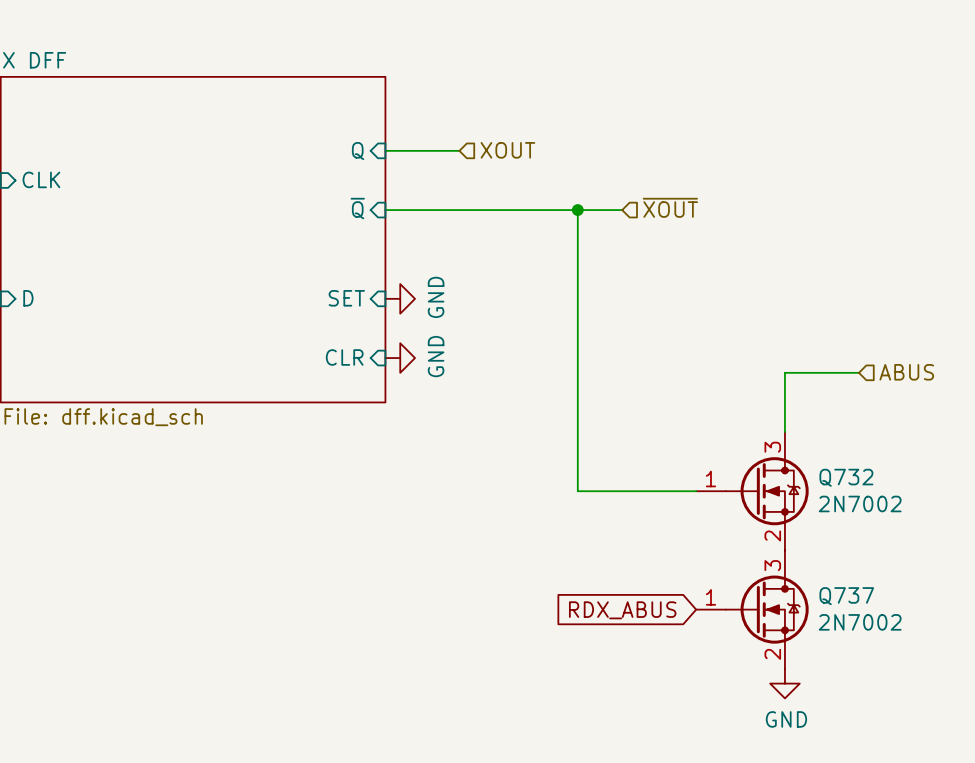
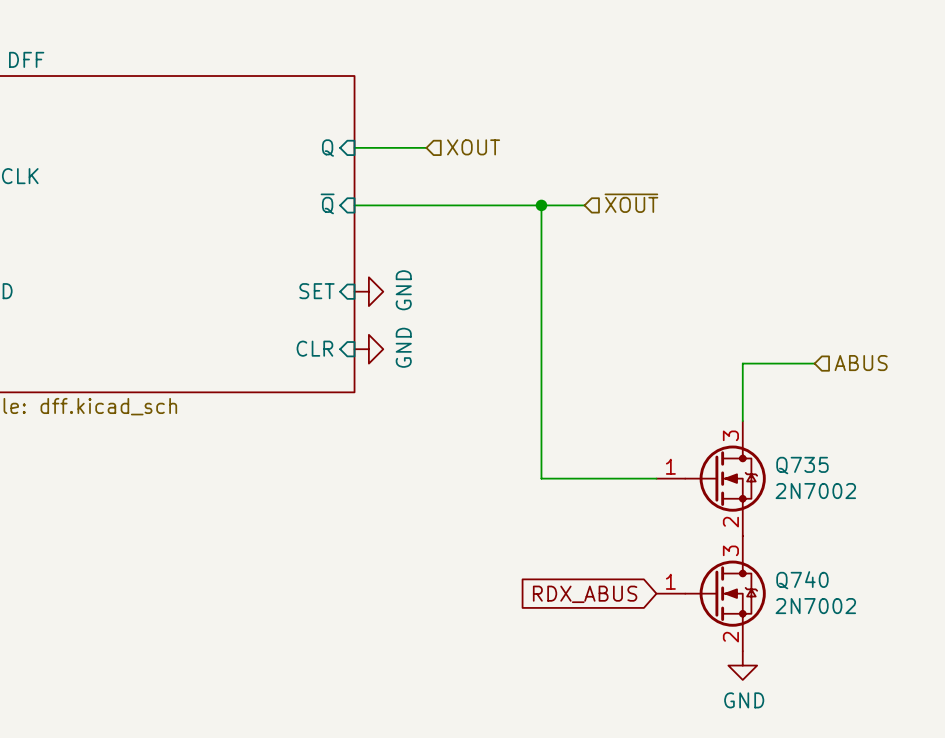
Q732 name: Q732 (846, 477) -> Q735 (802, 465)
Q737 name: Q737 (846, 596) -> Q740 (802, 580)

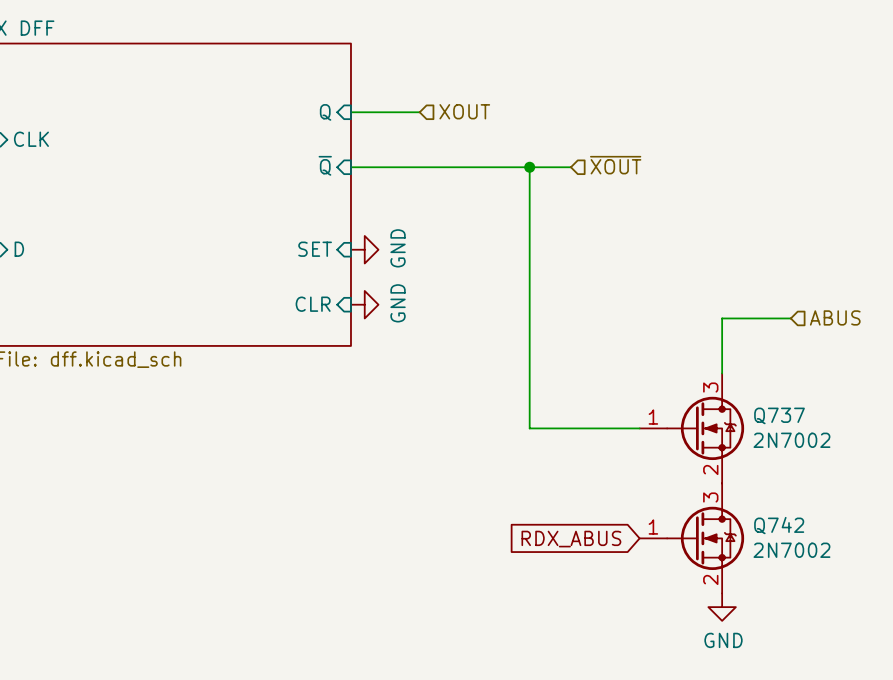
Q735 name: Q735 (802, 465) -> Q737 (779, 415)
Q740 name: Q740 (802, 580) -> Q742 (779, 525)

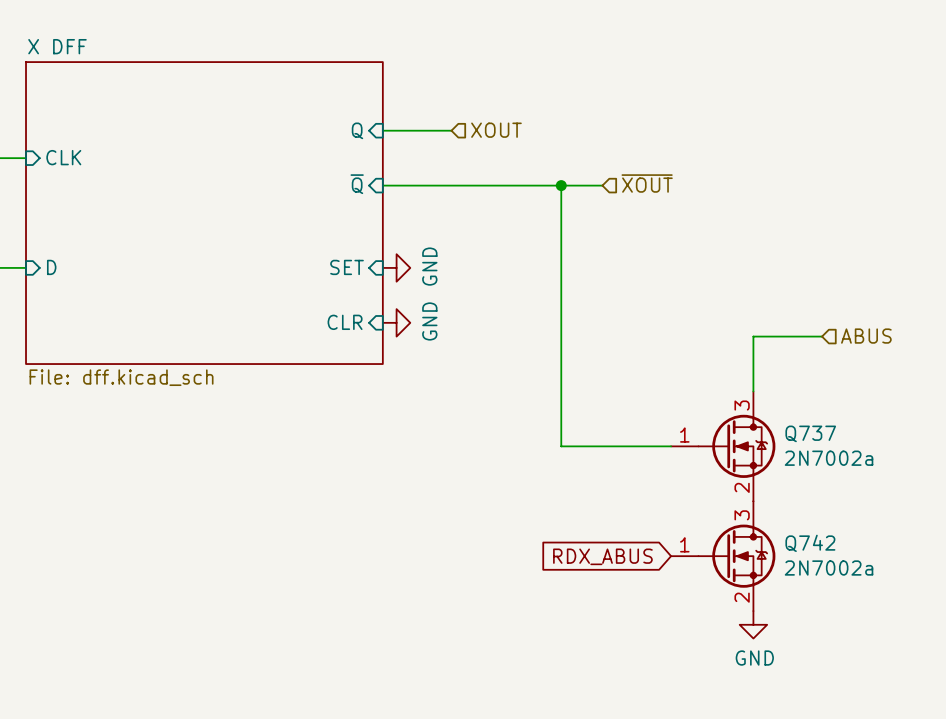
Q737 value: 2N7002 (791, 440) -> 2N7002a (829, 458)
Q742 value: 2N7002 (791, 550) -> 2N7002a (829, 568)

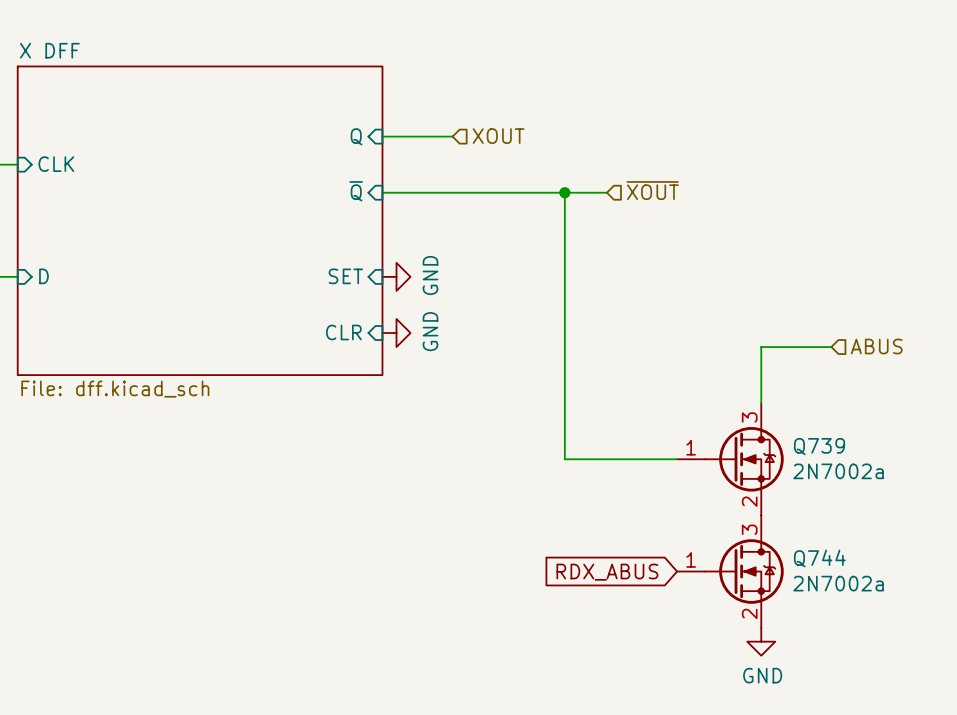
Q737 name: Q737 (810, 433) -> Q739 (819, 446)
Q742 name: Q742 (810, 543) -> Q744 (819, 558)

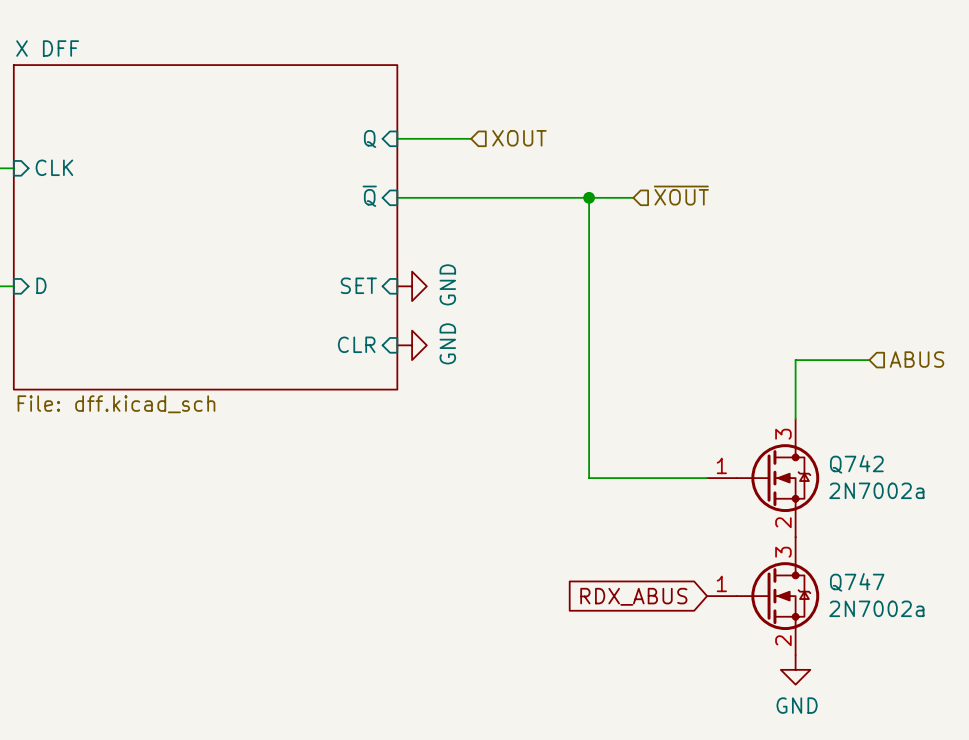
Q739 name: Q739 (819, 446) -> Q742 (856, 464)
Q744 name: Q744 (819, 558) -> Q747 (857, 582)

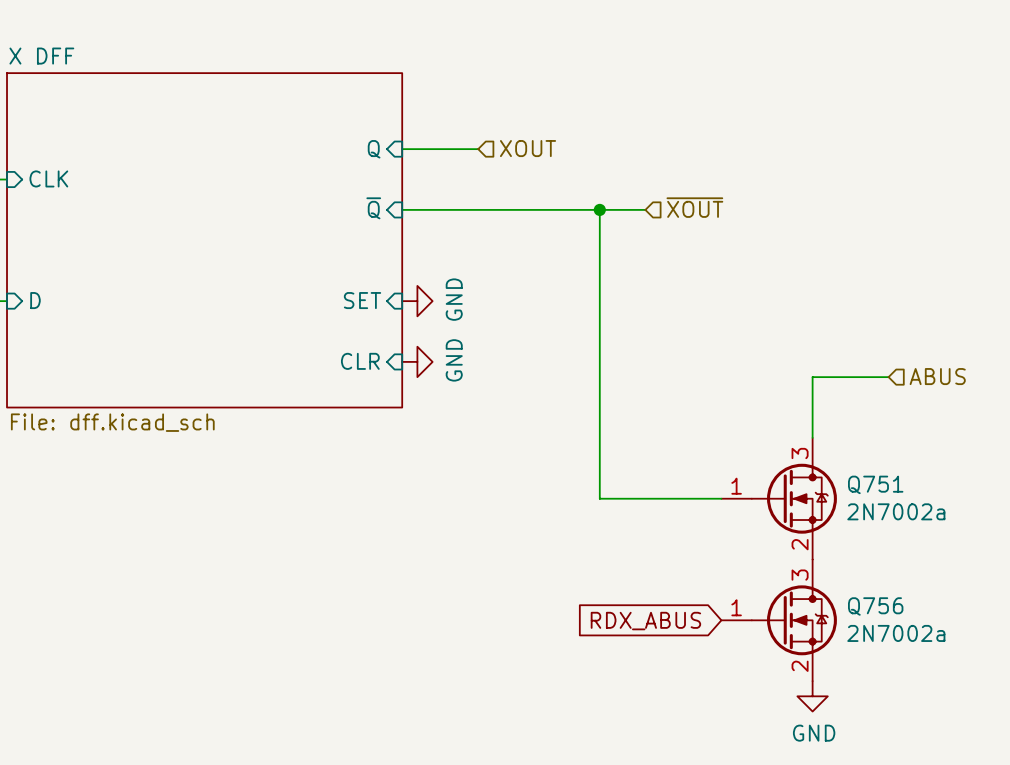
Q742 name: Q742 (856, 464) -> Q751 (875, 484)
Q747 name: Q747 (857, 582) -> Q756 (875, 606)

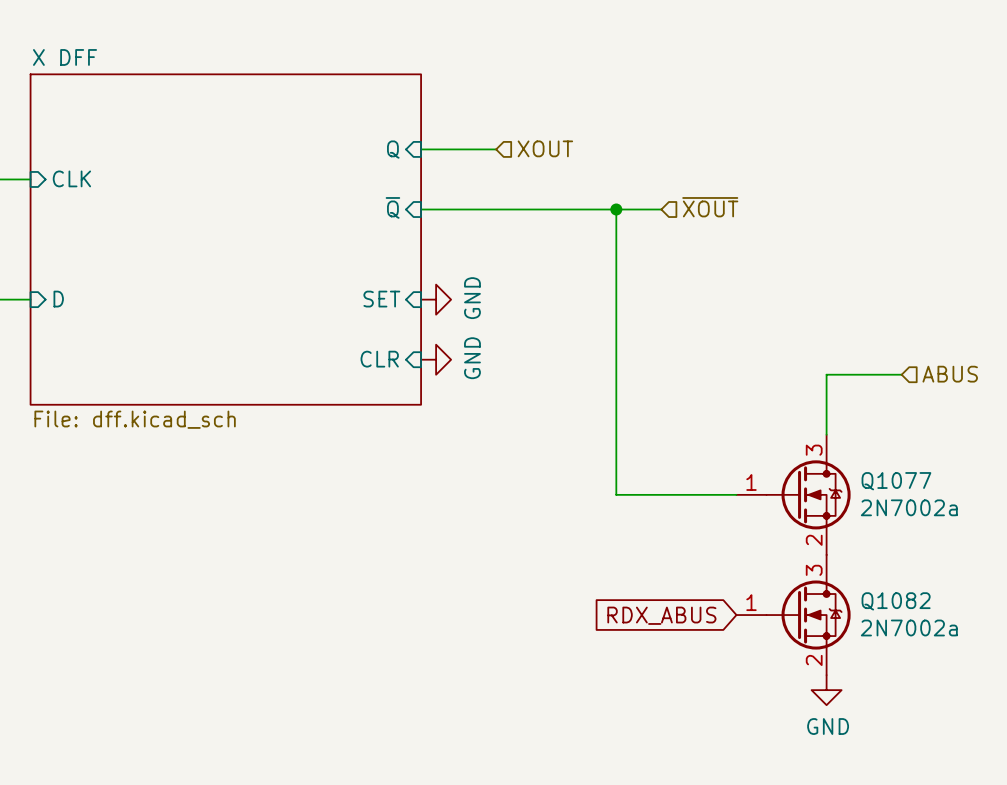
Q751 name: Q751 (875, 484) -> Q1077 (896, 481)
Q756 name: Q756 (875, 606) -> Q1082 (896, 601)

